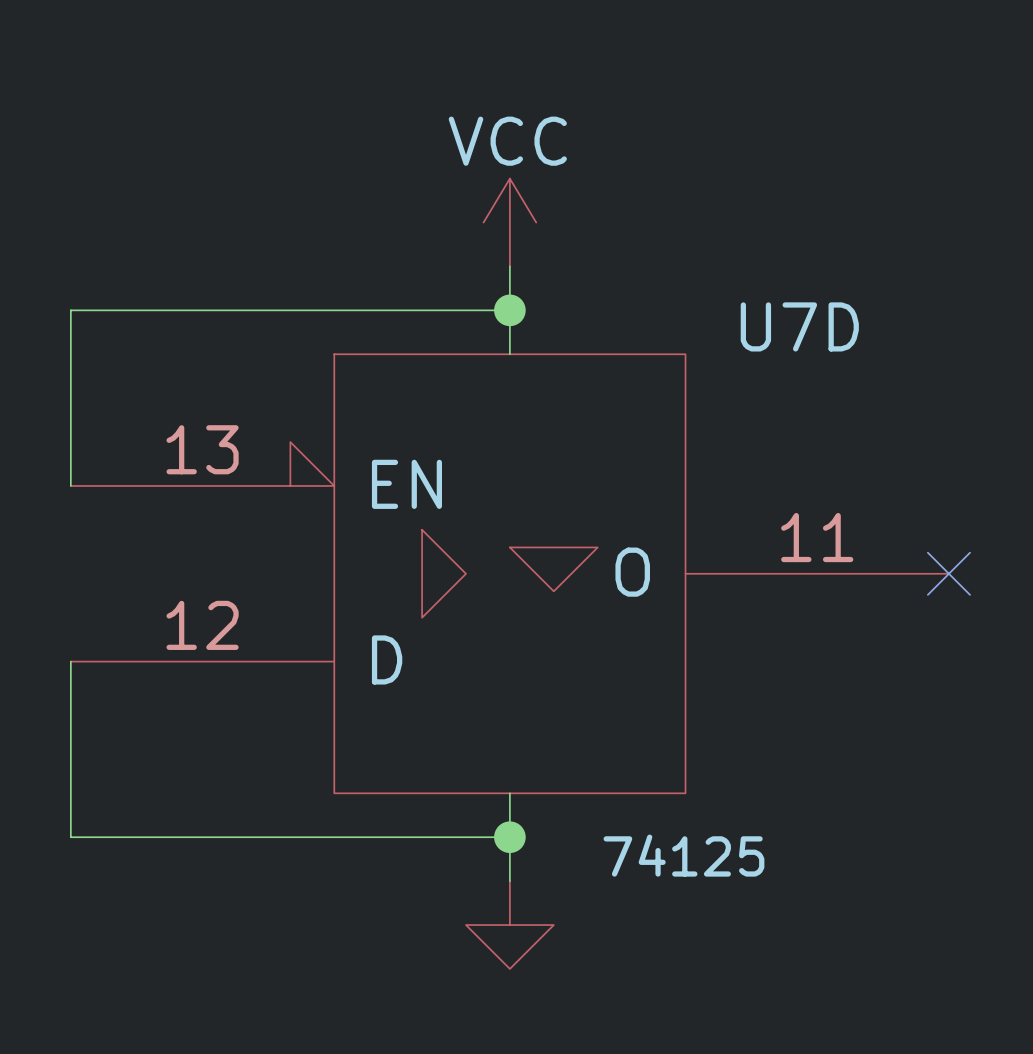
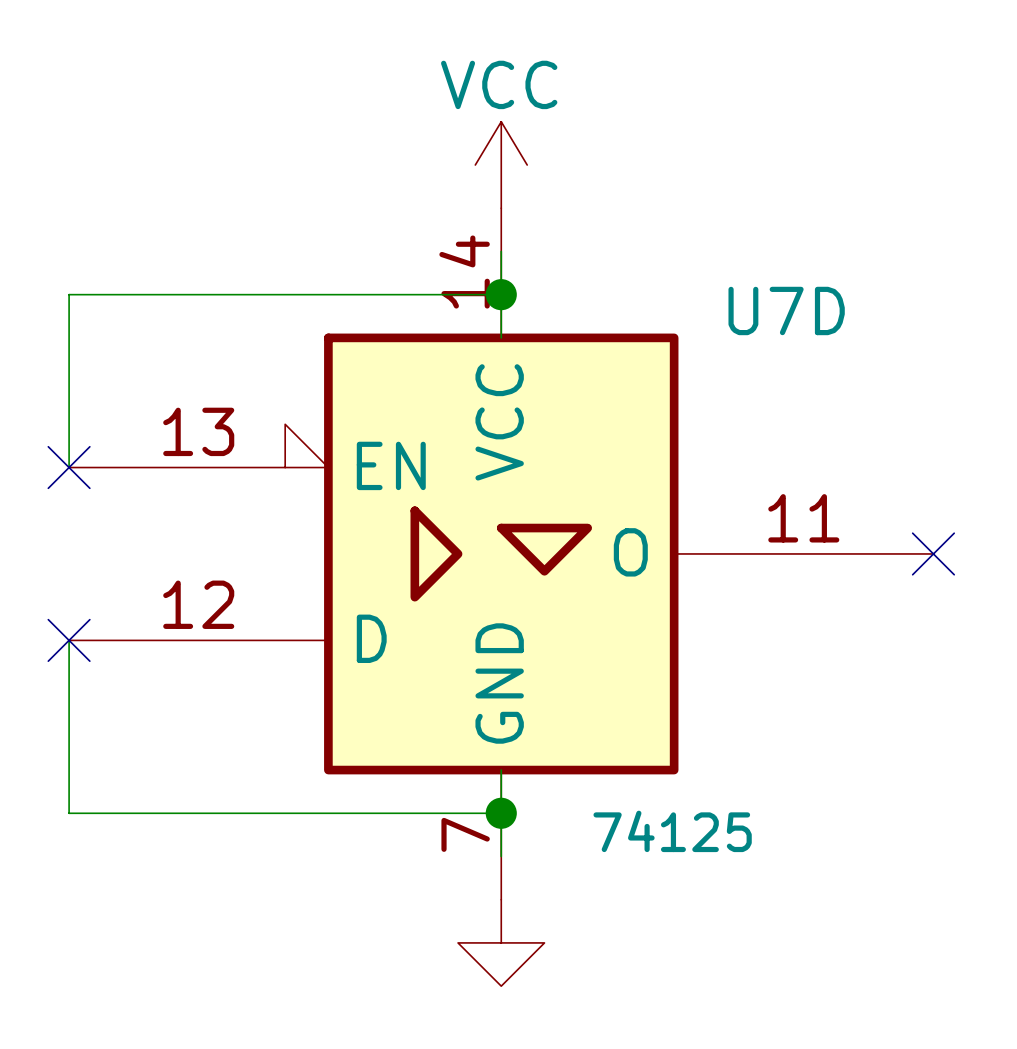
power symbol position: VCC (509, 222) -> VCC (501, 165)
U7D symbol: [70, 354, 949, 794] -> [69, 208, 934, 900]
no-connect mark: none -> (69, 467)
no-connect mark: none -> (69, 640)
power symbol position: (509, 925) -> (501, 942)

